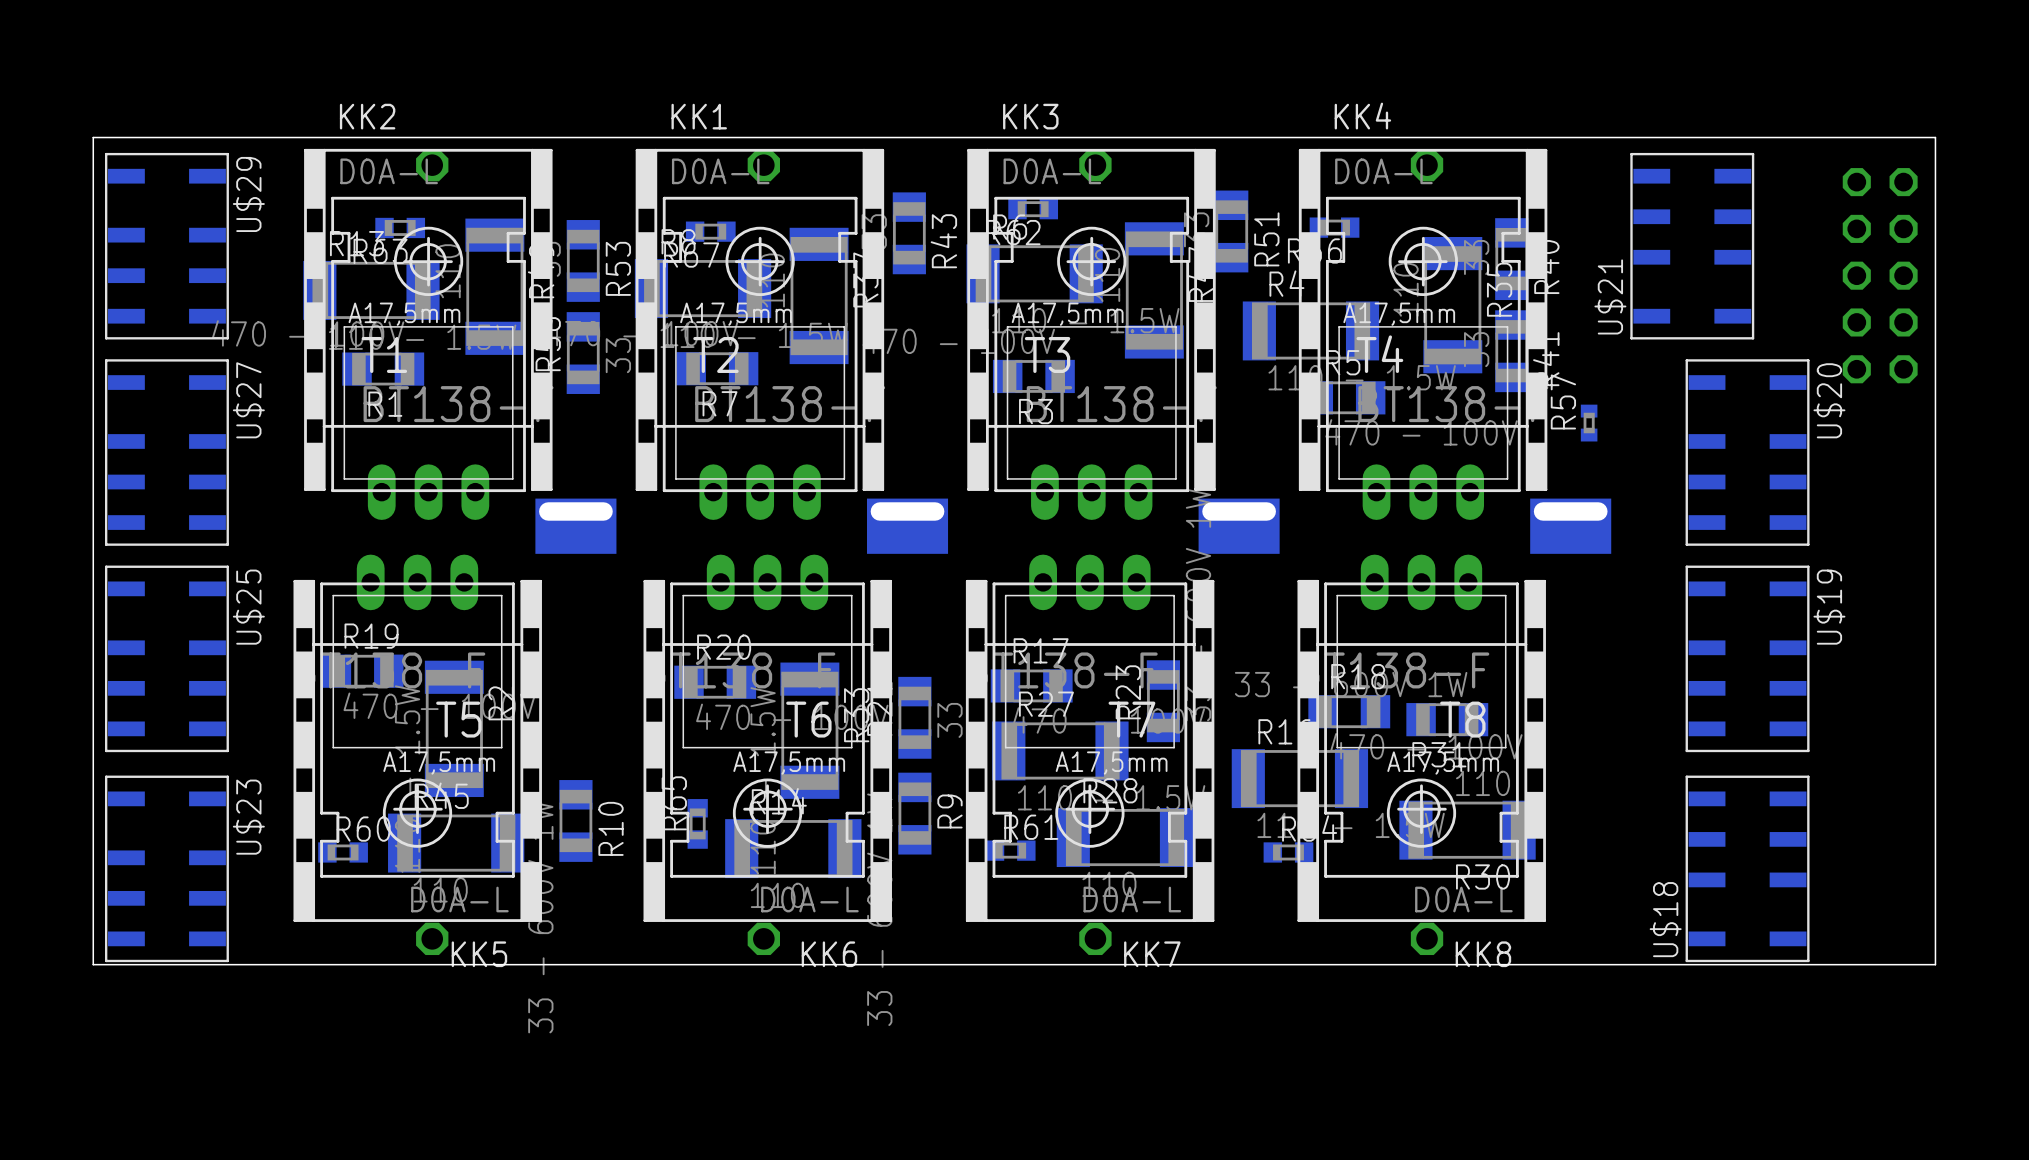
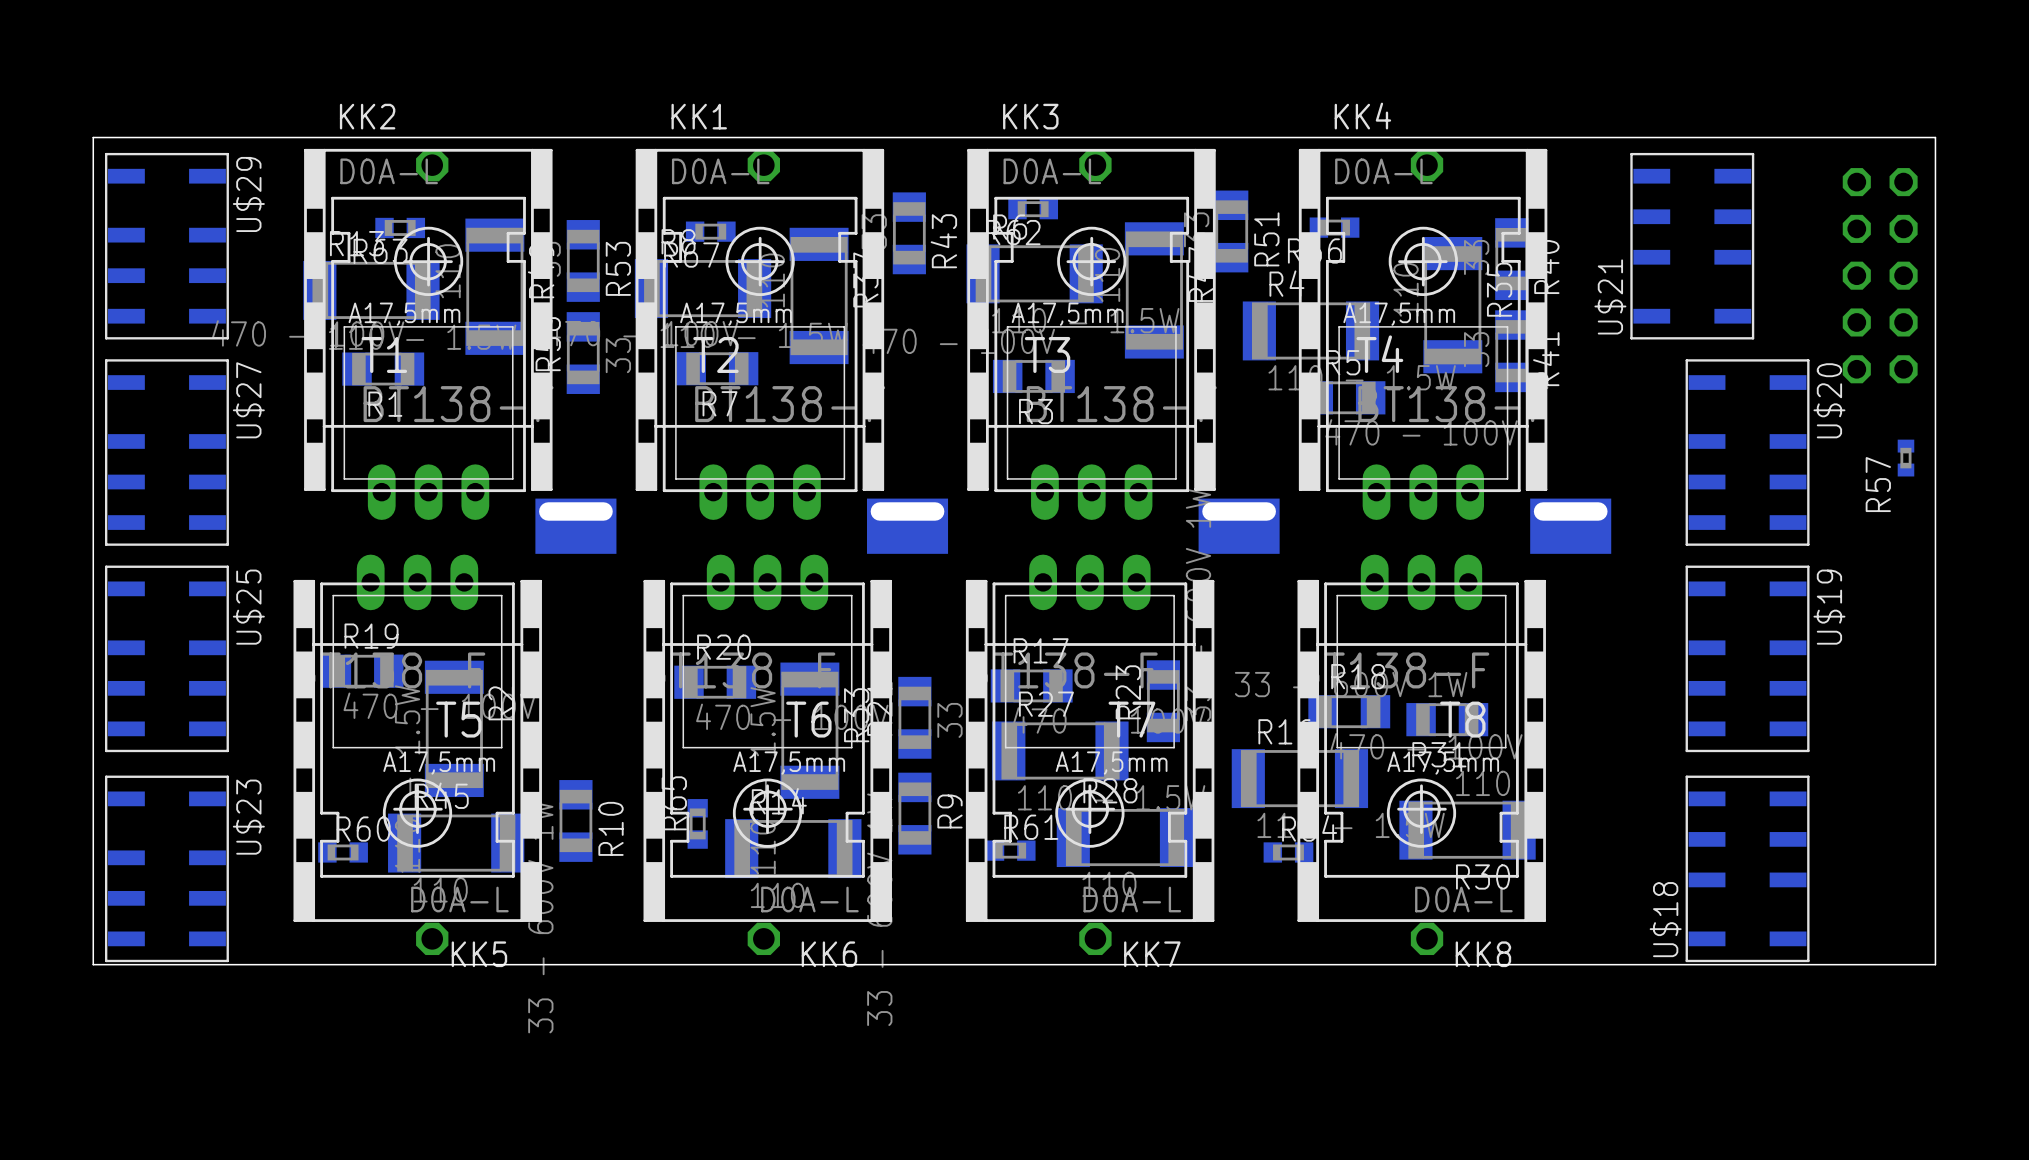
R57 name position: R57 (1563, 401) -> R57 (1878, 484)
R57 position: (1589, 423) -> (1905, 458)

